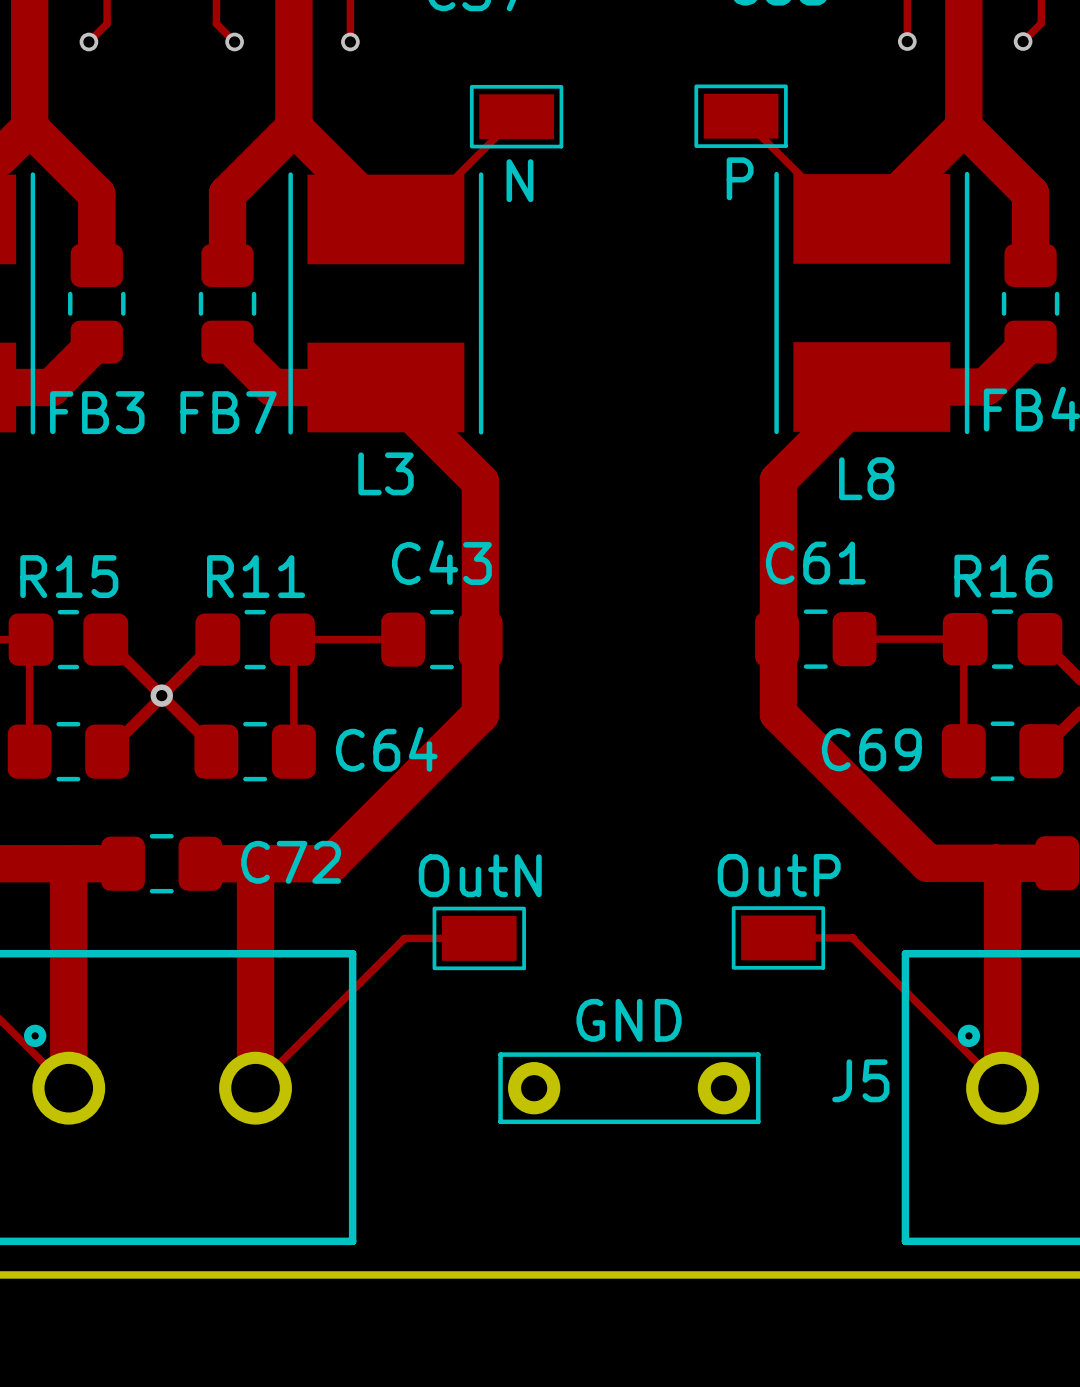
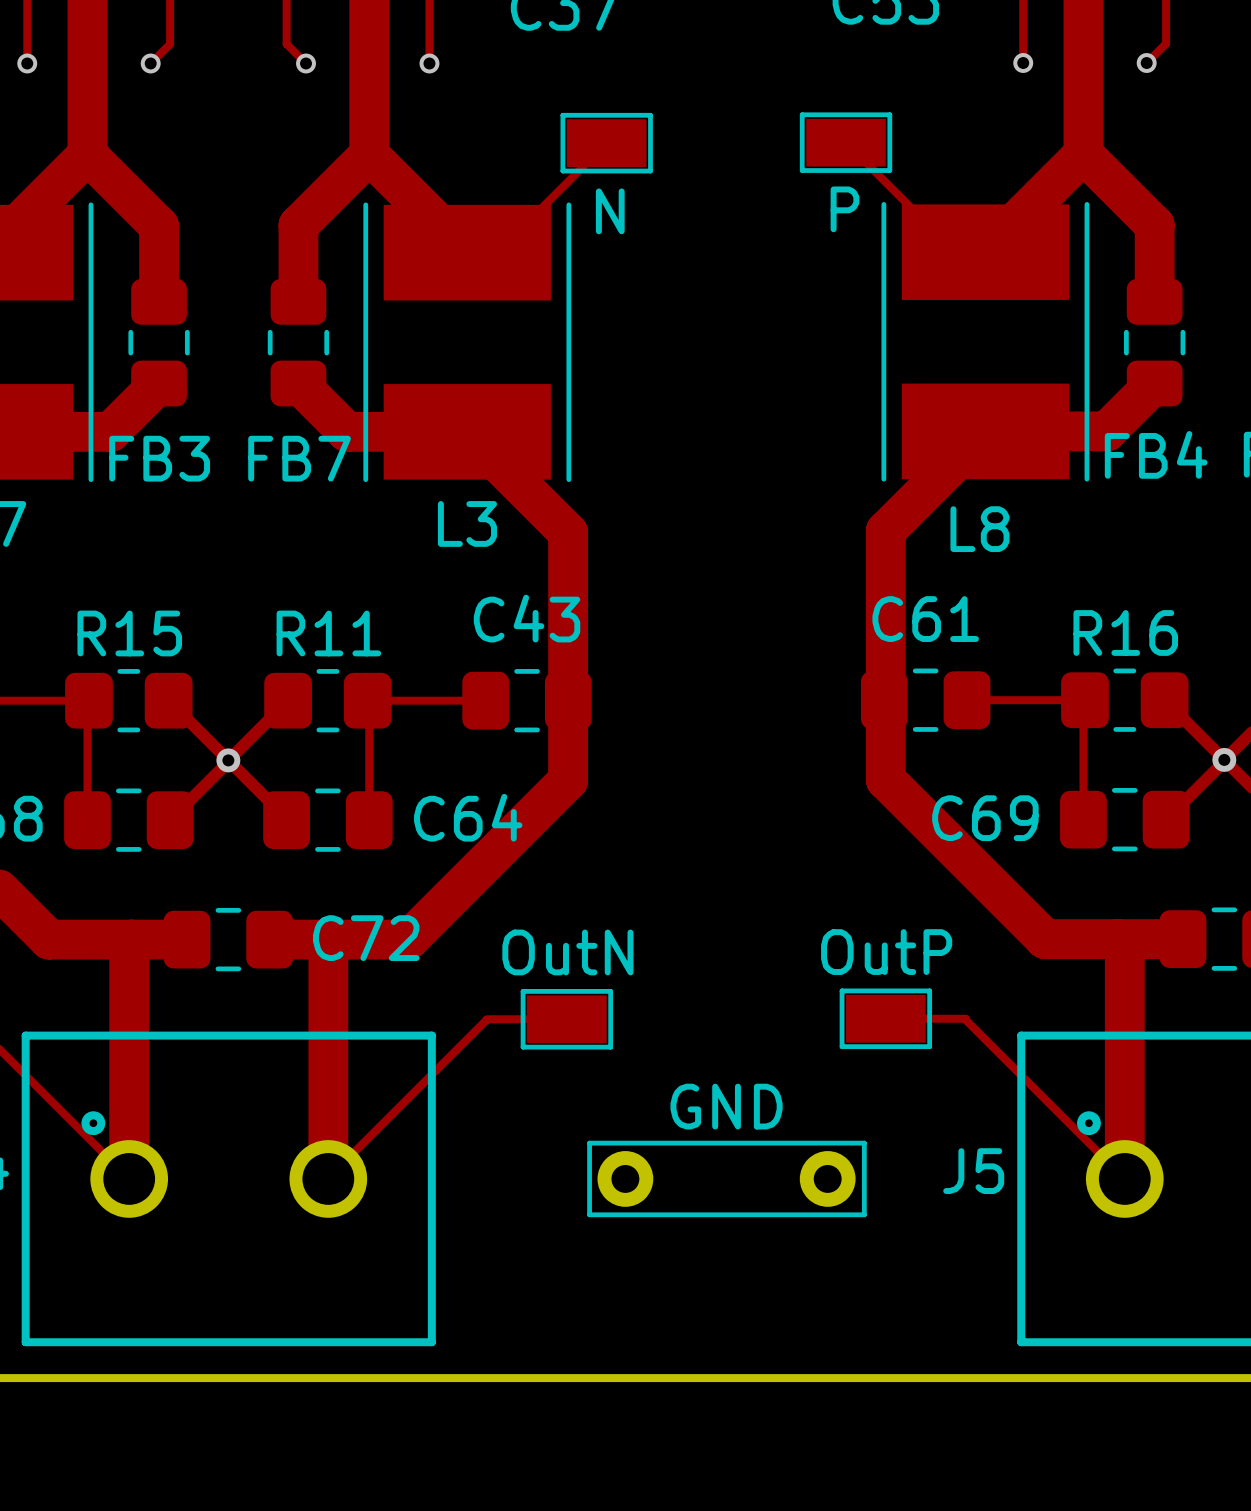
part footprint: [469, 84, 564, 149] -> [560, 112, 653, 174]
part footprint: [694, 84, 788, 148] -> [799, 112, 893, 173]
part footprint: [432, 906, 526, 971] -> [520, 988, 614, 1050]
part footprint: [731, 906, 826, 970] -> [839, 988, 933, 1050]

